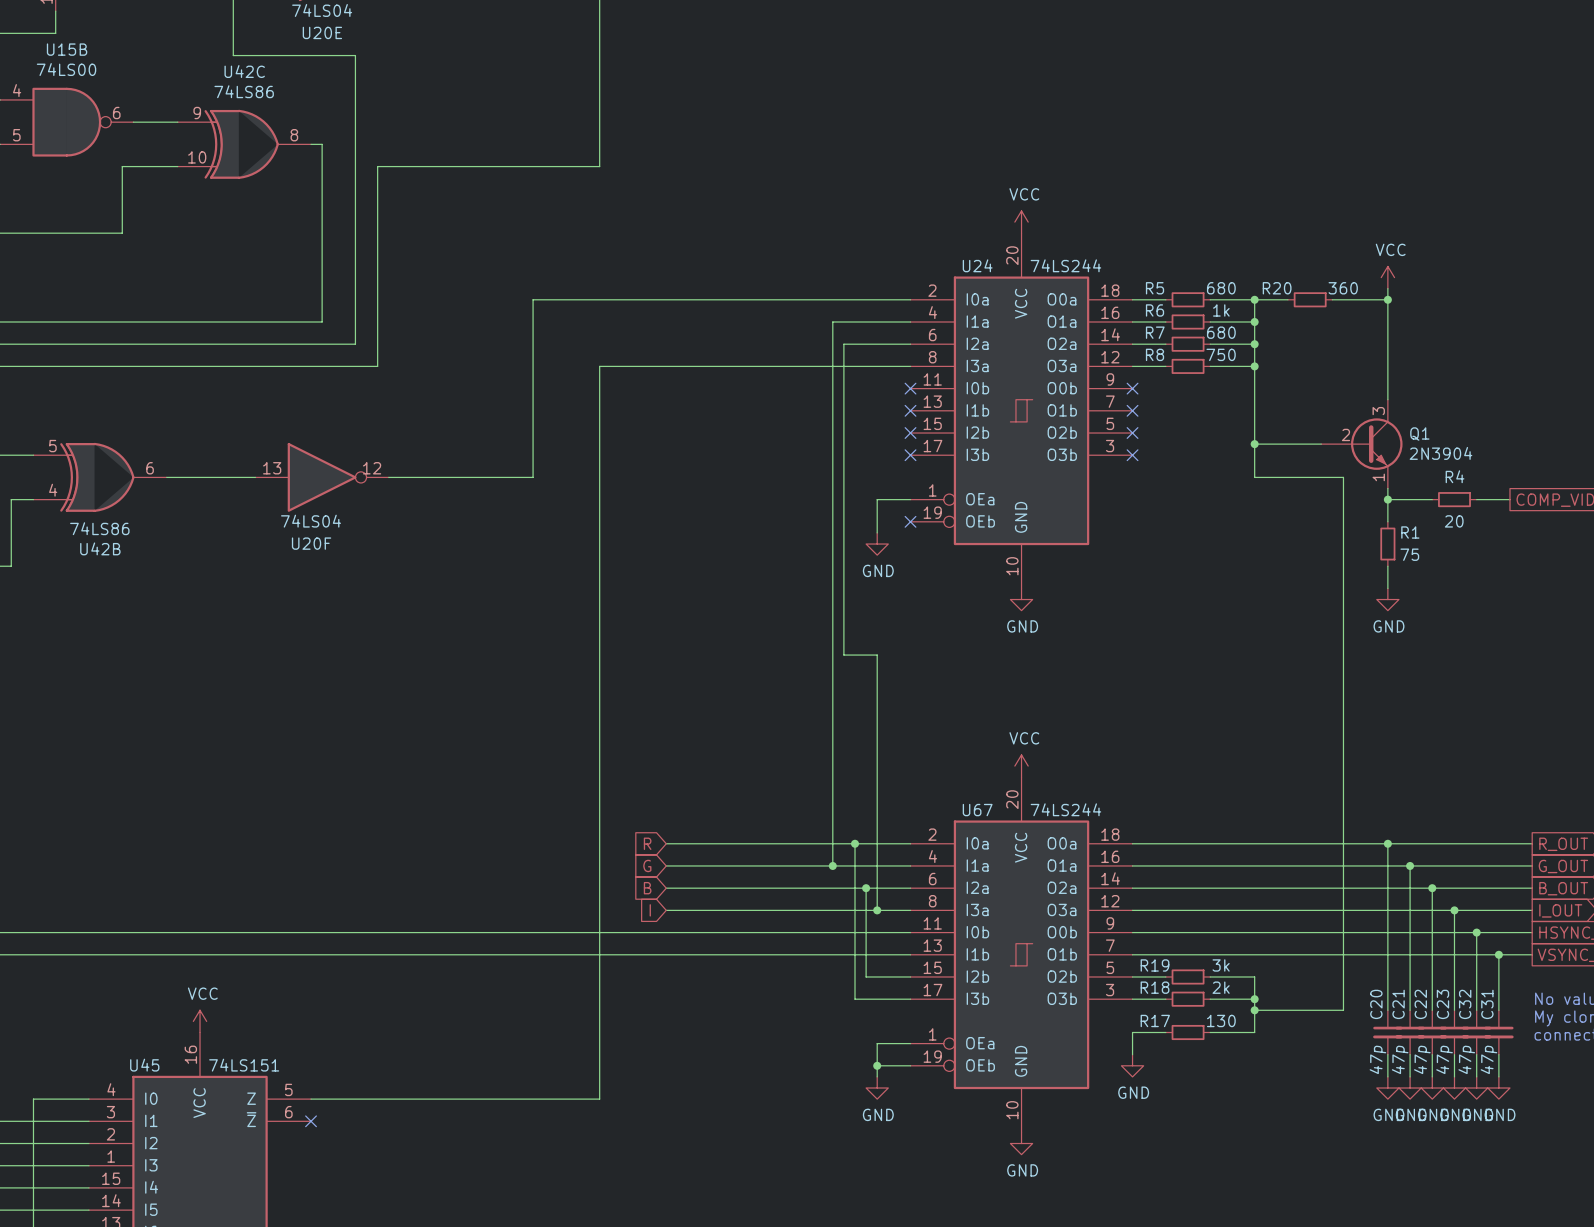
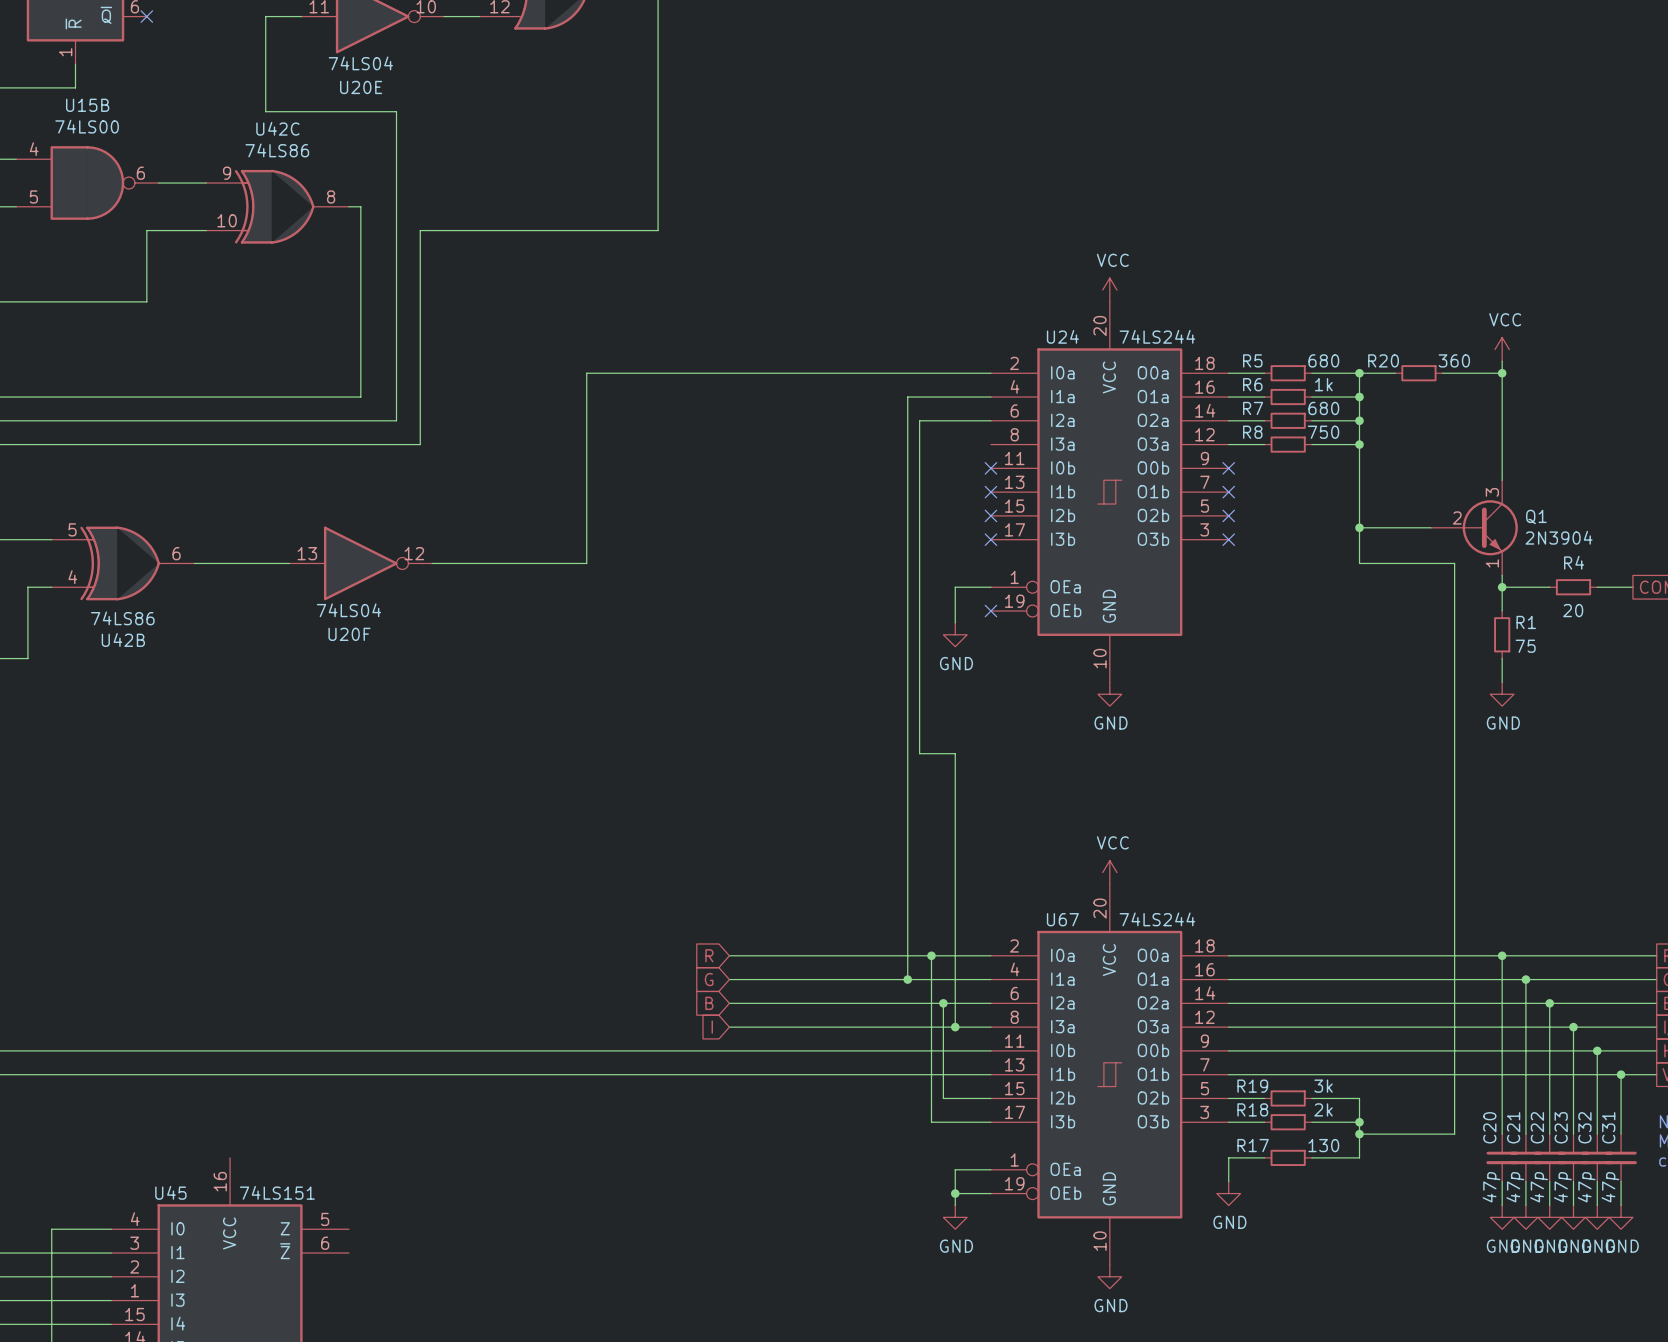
wire: (910, 366) (599, 366) (599, 1099) (311, 1099) -> none
power symbol: VCC (200, 1021) -> none
no-connect mark: (311, 1121) -> none

